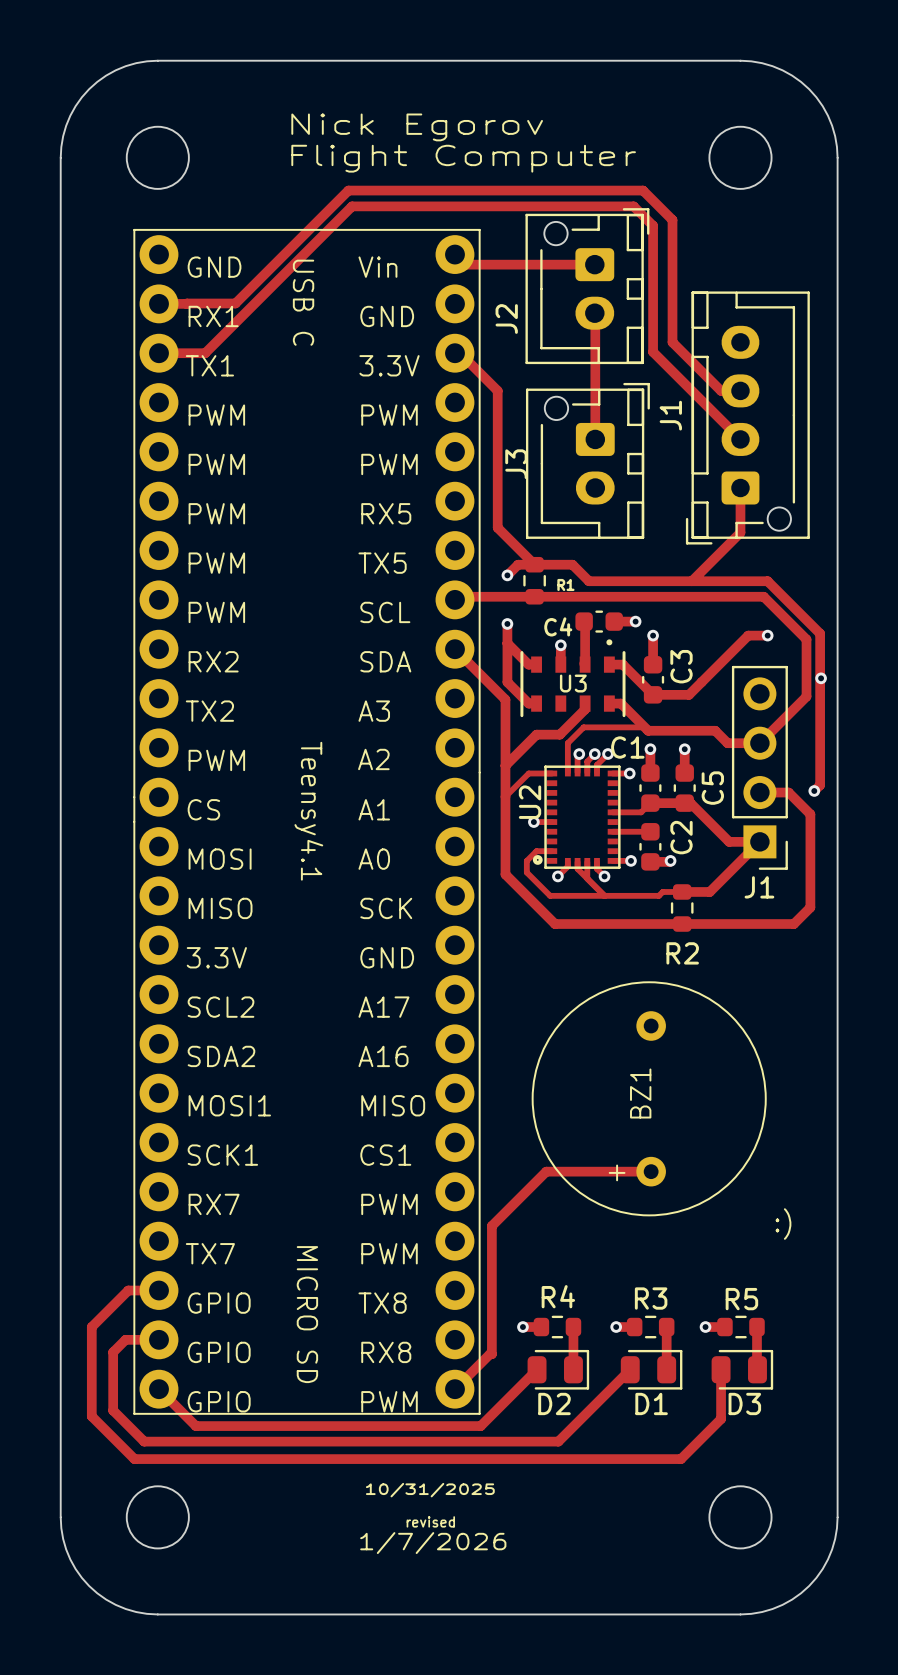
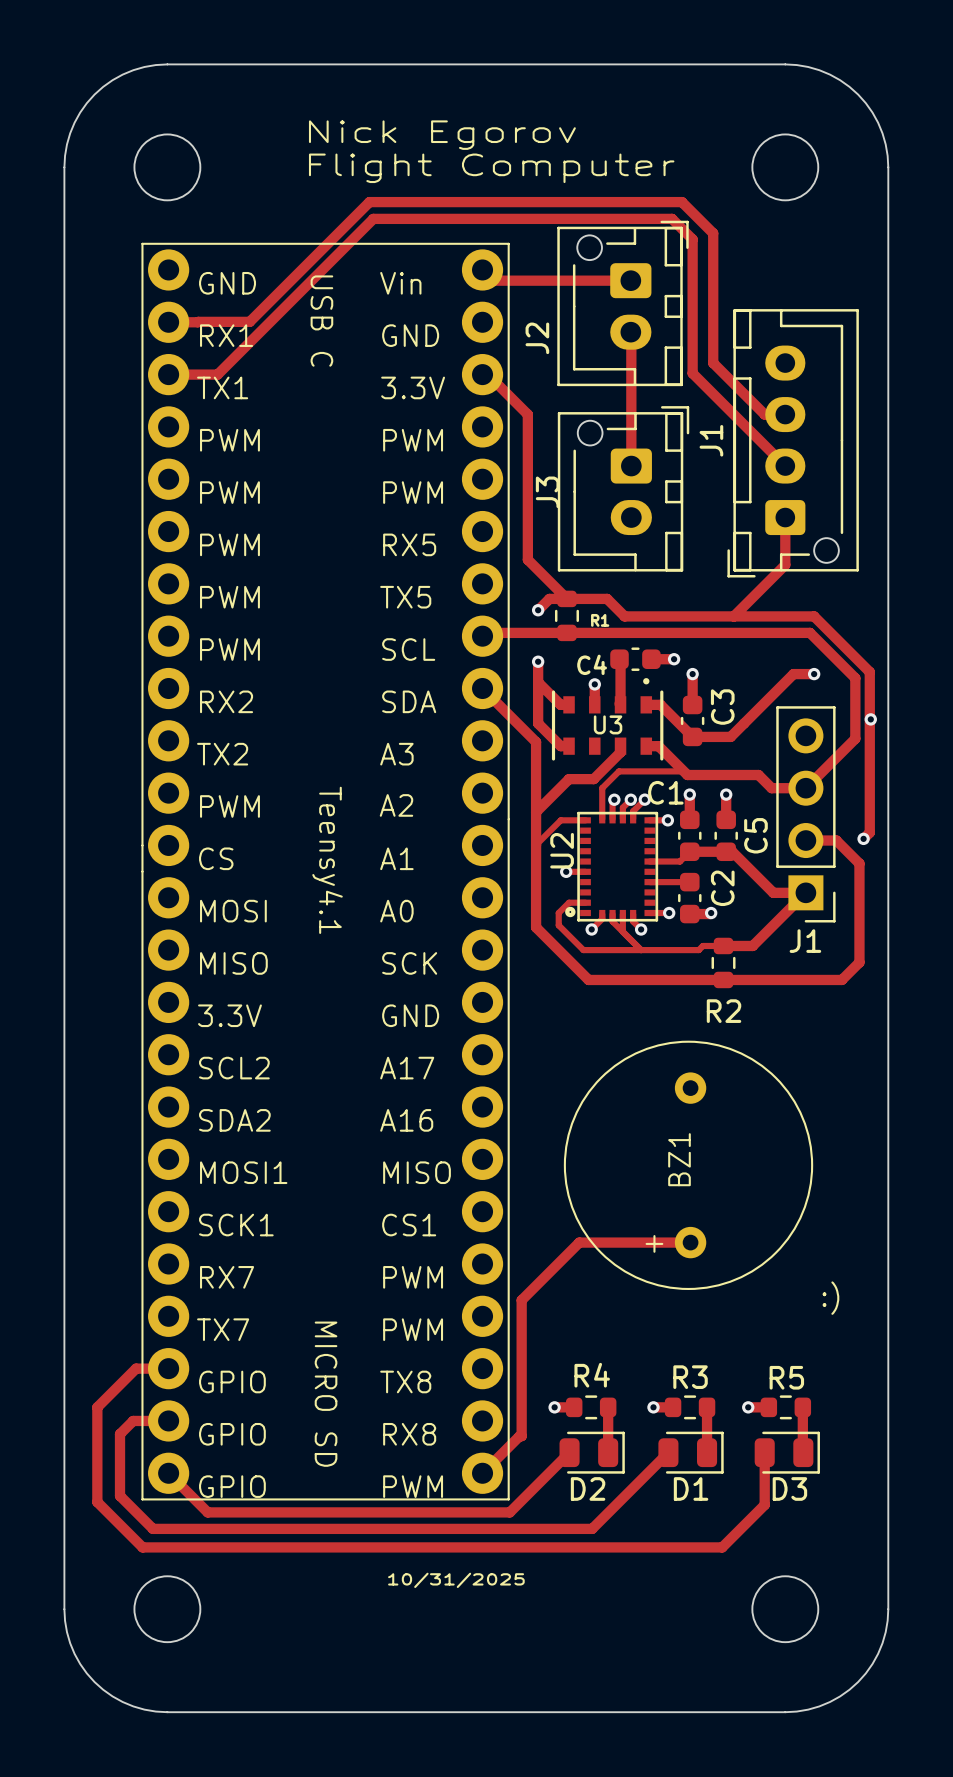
text: revised (430, 1521) -> none
text: 1/7/2026 (433, 1543) -> none

